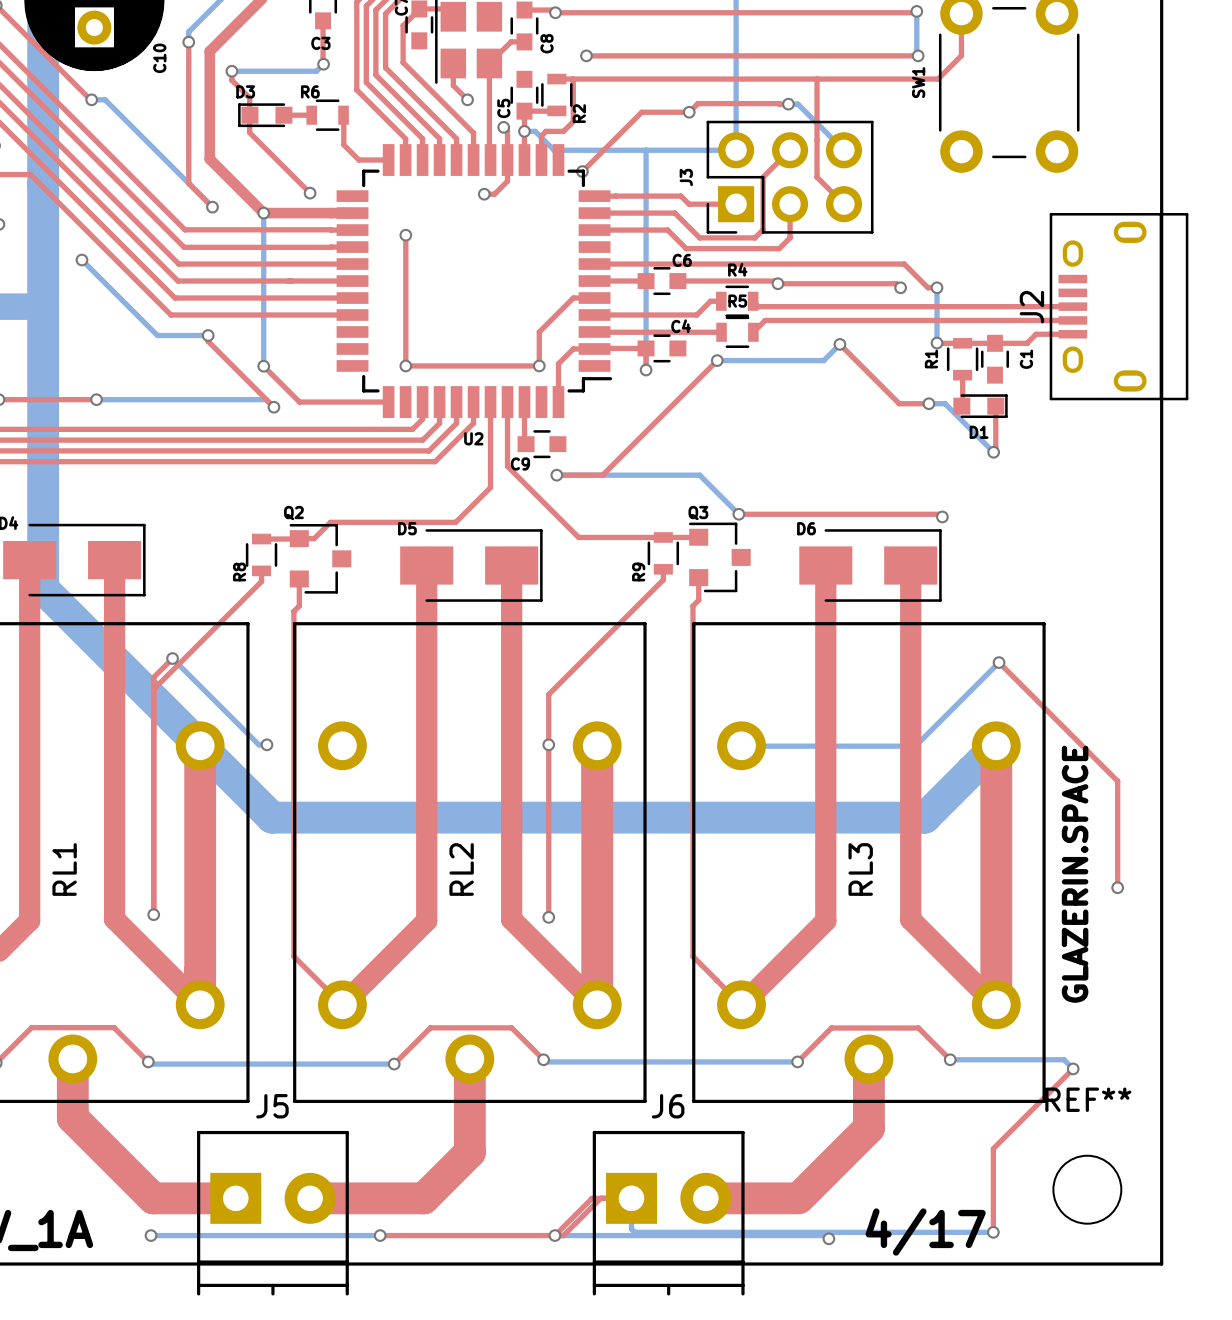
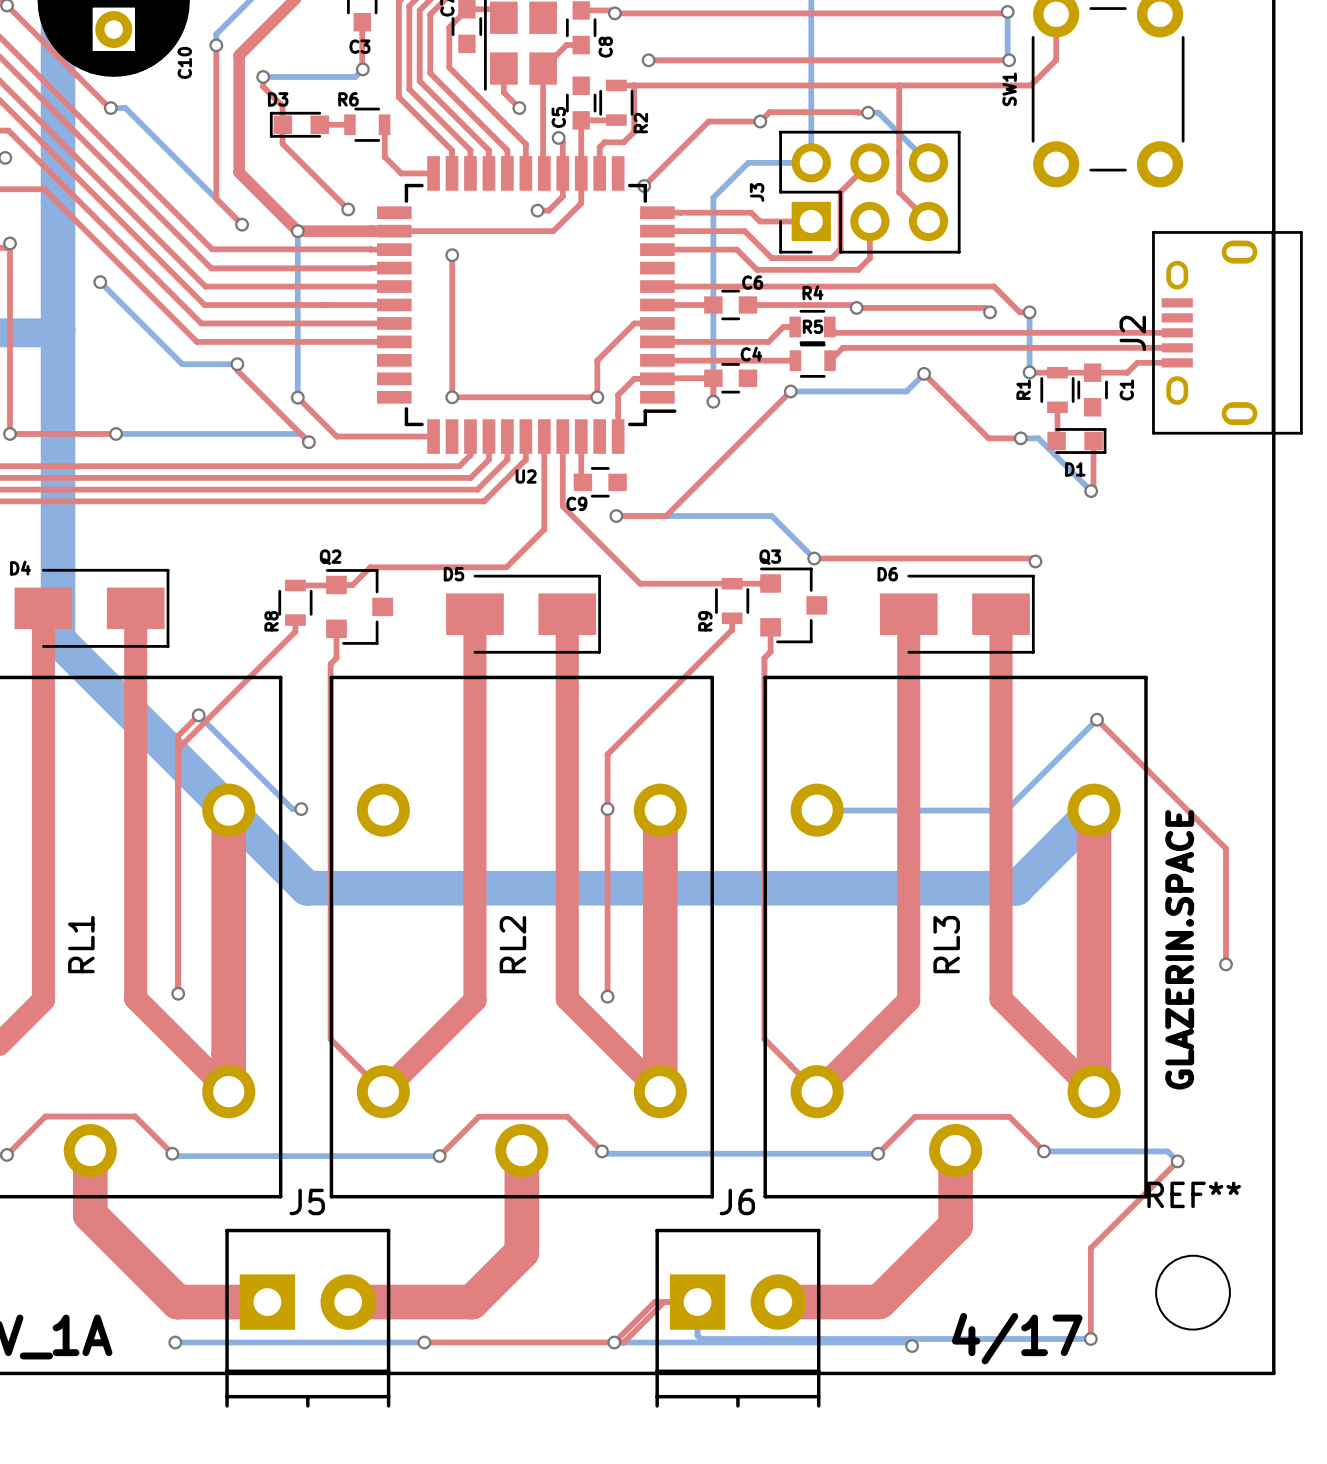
bottom track: (524, 131) (535, 131) (554, 150) (678, 150) -> none
via: (524, 131) -> none
bottom track: (646, 150) (646, 182) -> (748, 162) (713, 197)
top track: none -> (581, 173) (581, 203) (553, 231) (394, 231)

